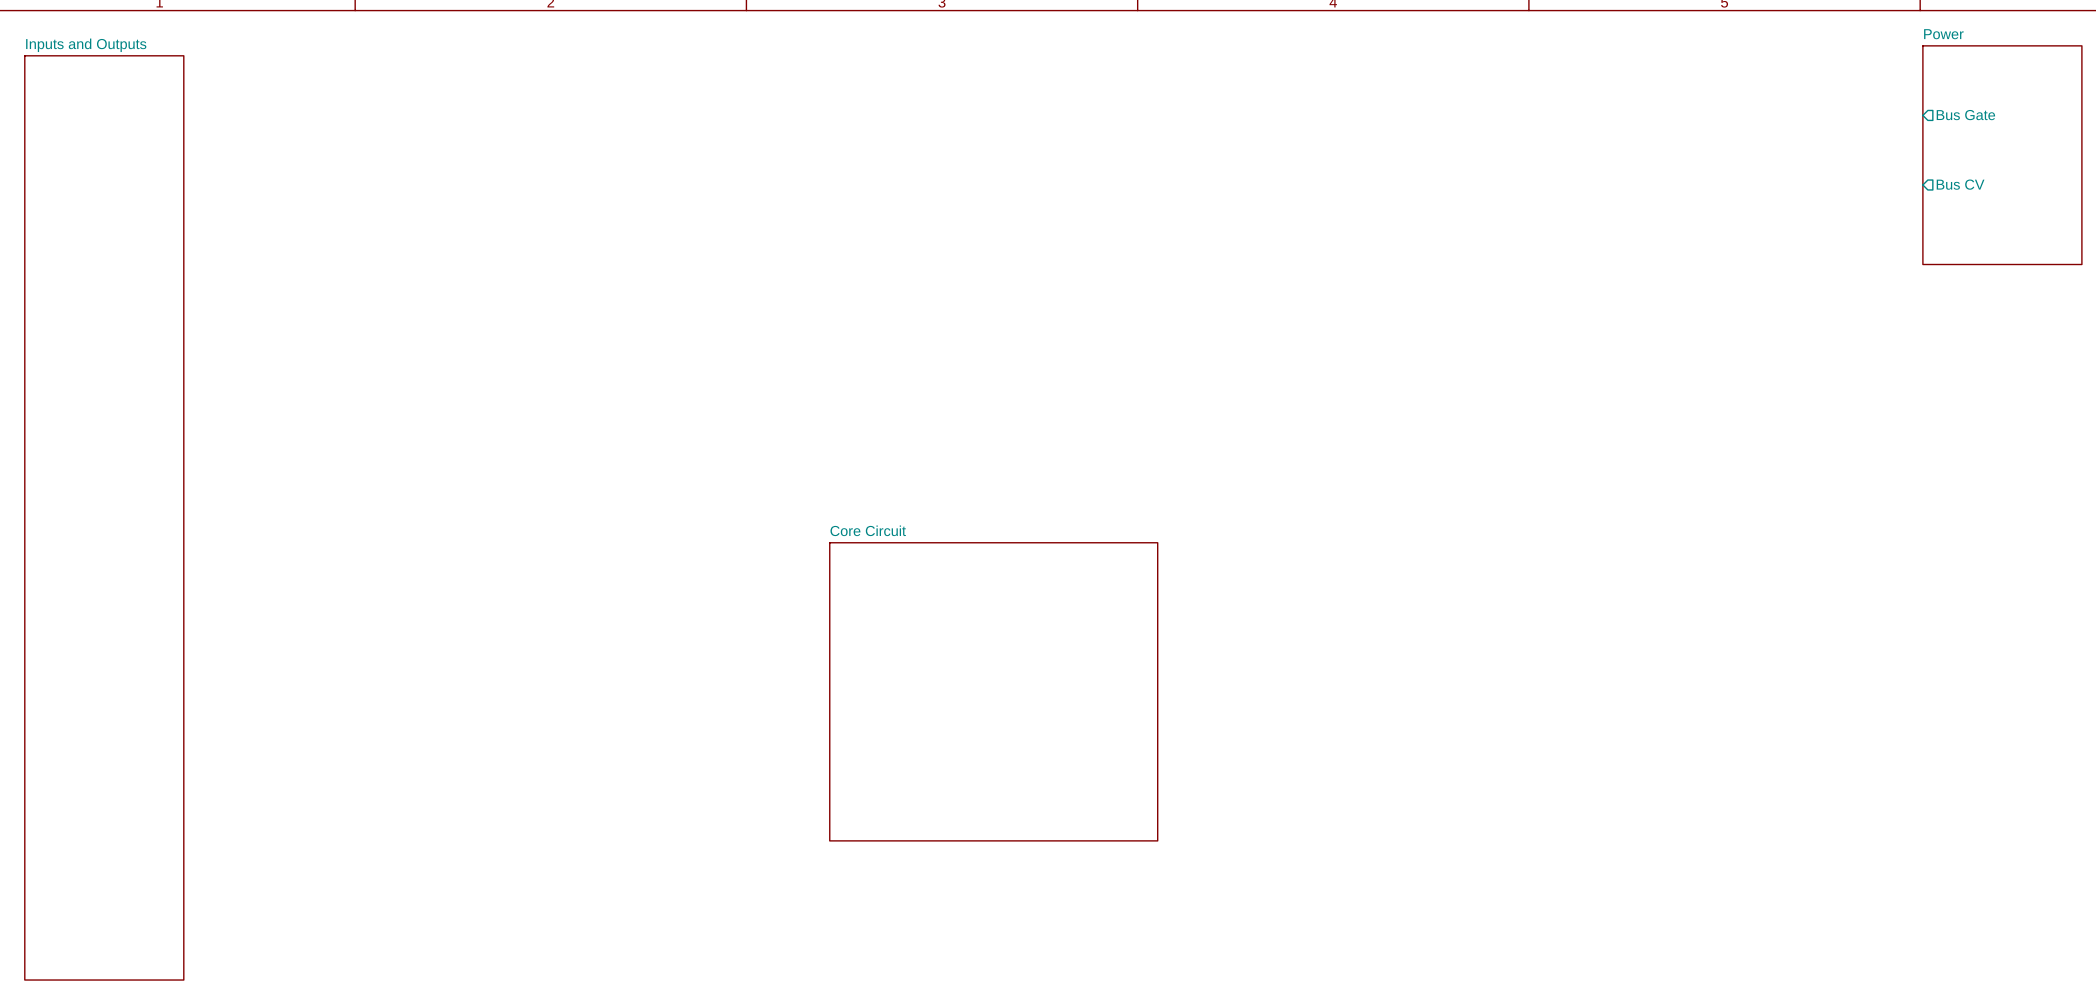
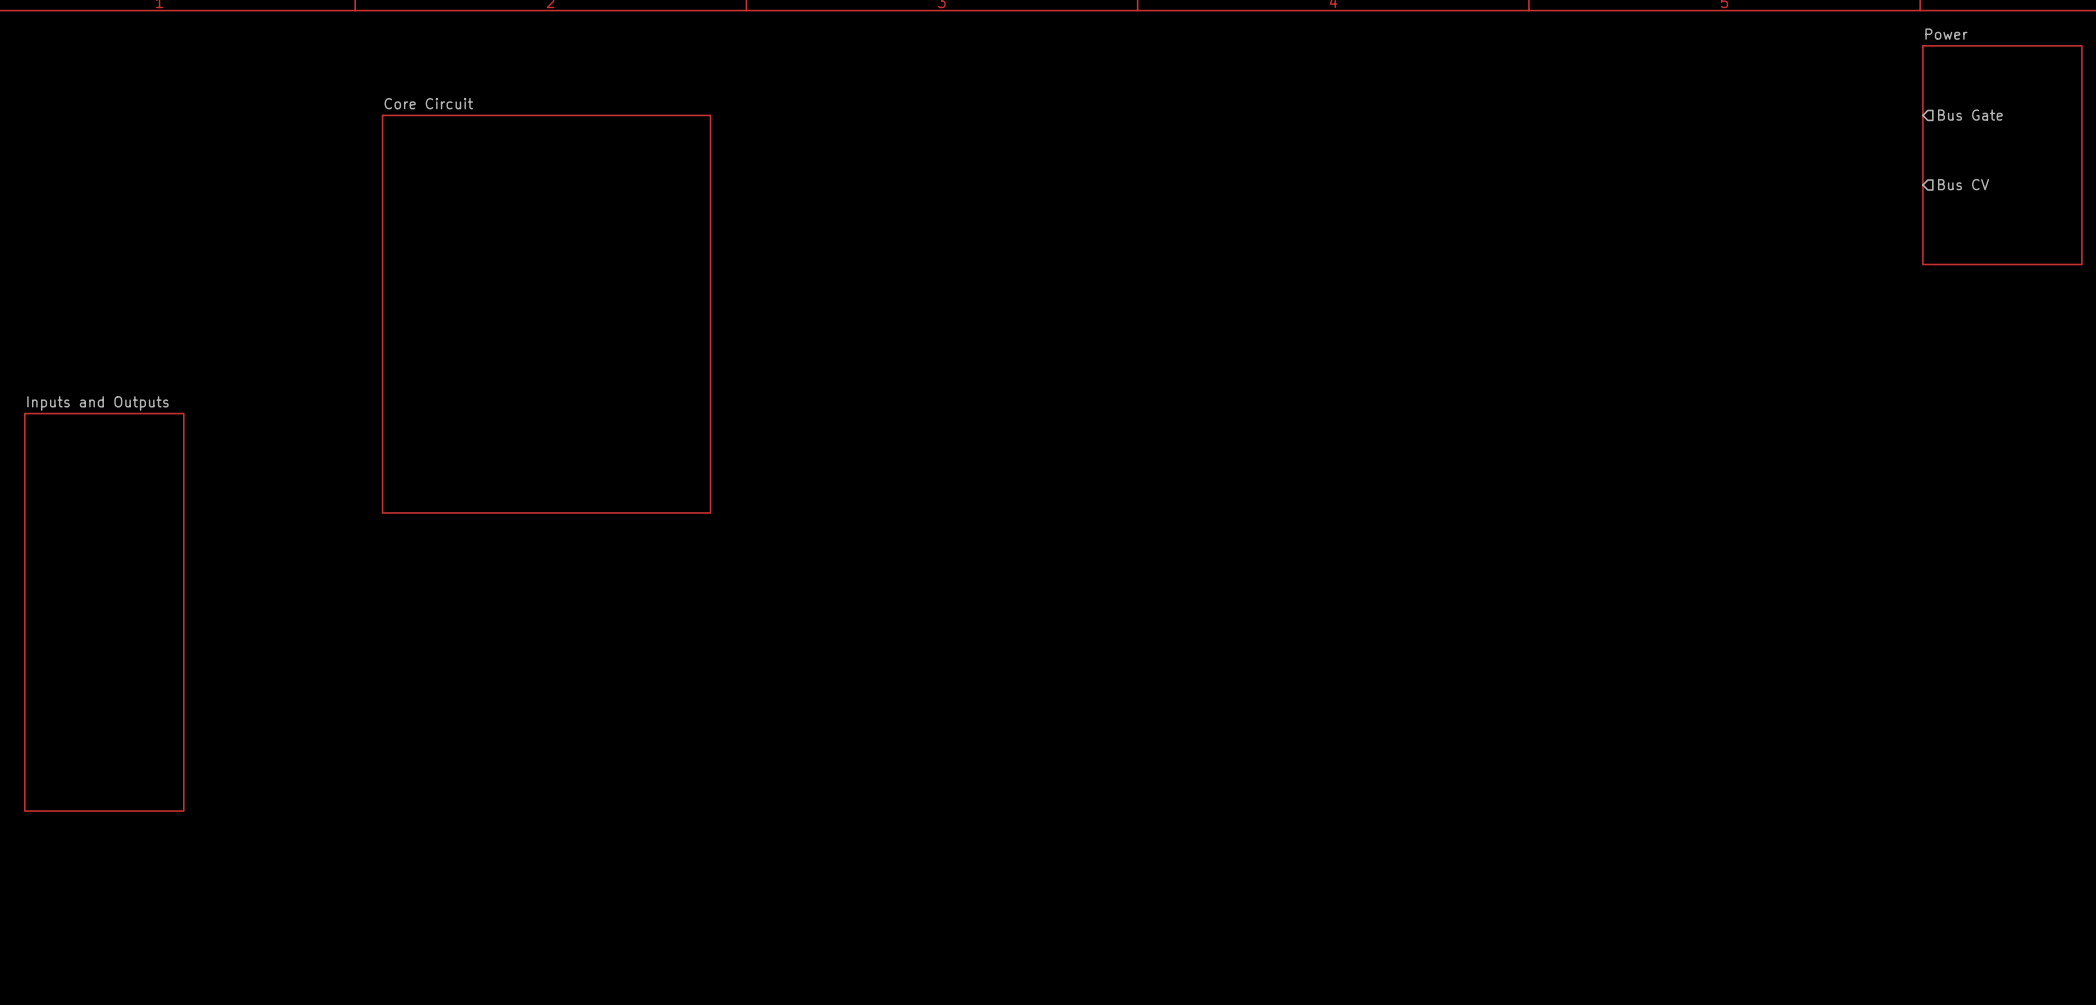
sheet Core Circuit: none -> (546, 314)
sheet Inputs and Outputs: (104, 517) -> none
sheet Inputs and Outputs: none -> (104, 612)
sheet Core Circuit: (993, 691) -> none

